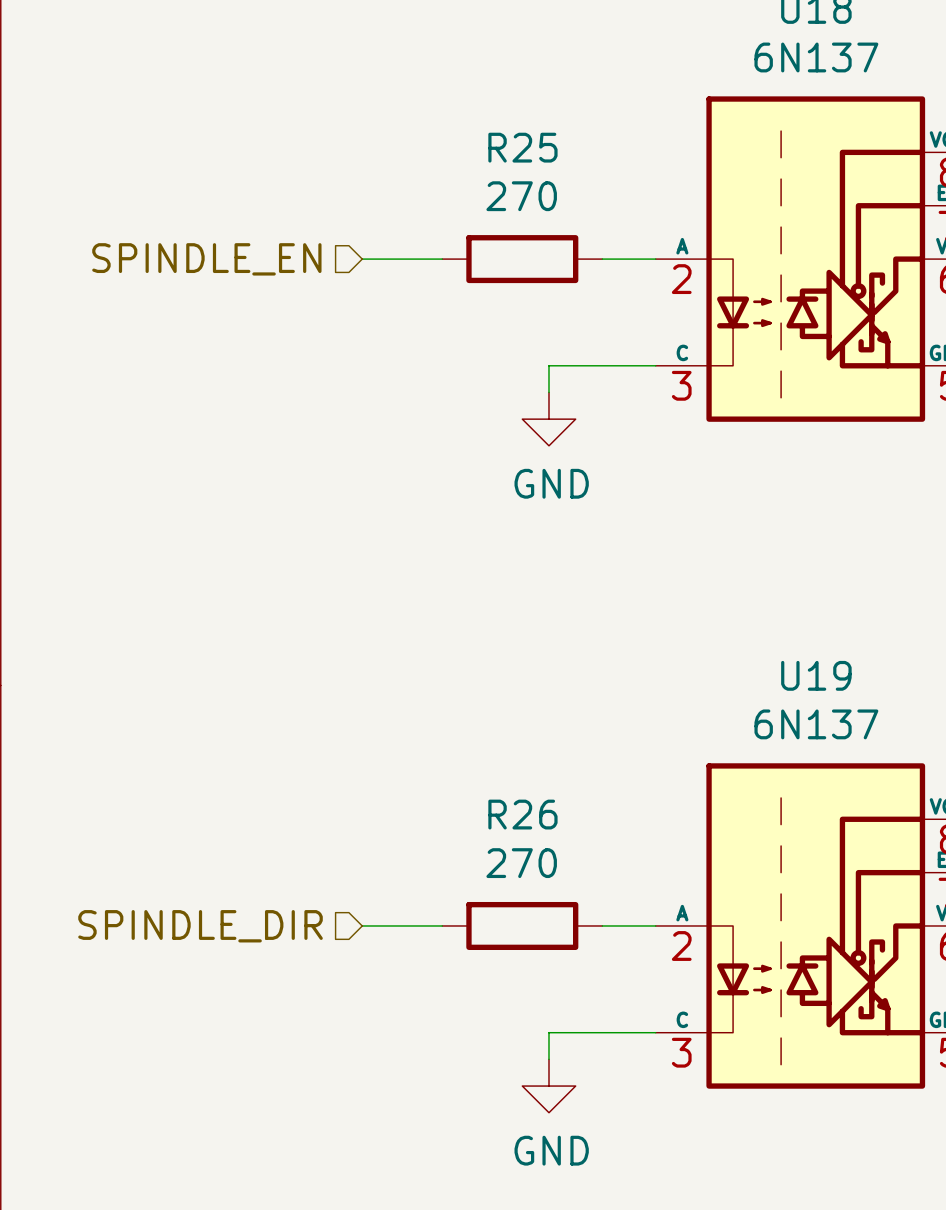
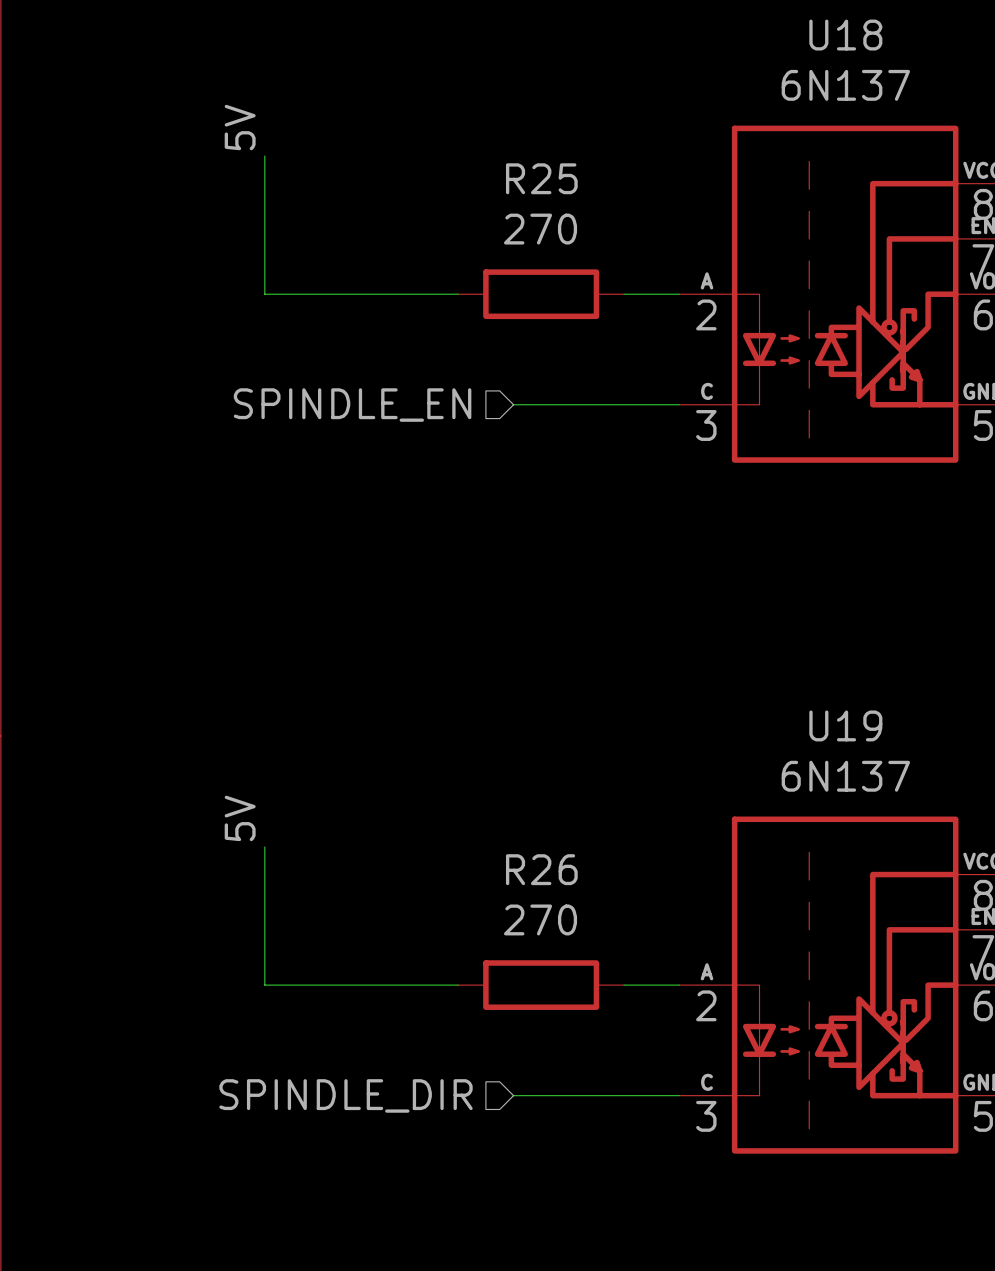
label: none -> 5V (240, 127)
wire: none -> (264, 156) (264, 294) (375, 294)
hierarchical label position: SPINDLE_EN (206, 259) -> SPINDLE_EN (352, 405)
wire: (548, 365) (548, 392) -> (568, 404) (513, 404)
power symbol: GND (548, 419) -> none
label: none -> 5V (240, 818)
wire: none -> (264, 846) (264, 985) (375, 985)
hierarchical label position: SPINDLE_DIR (200, 926) -> SPINDLE_DIR (345, 1095)
wire: (548, 1032) (548, 1059) -> (568, 1095) (513, 1095)
power symbol: GND (548, 1086) -> none

